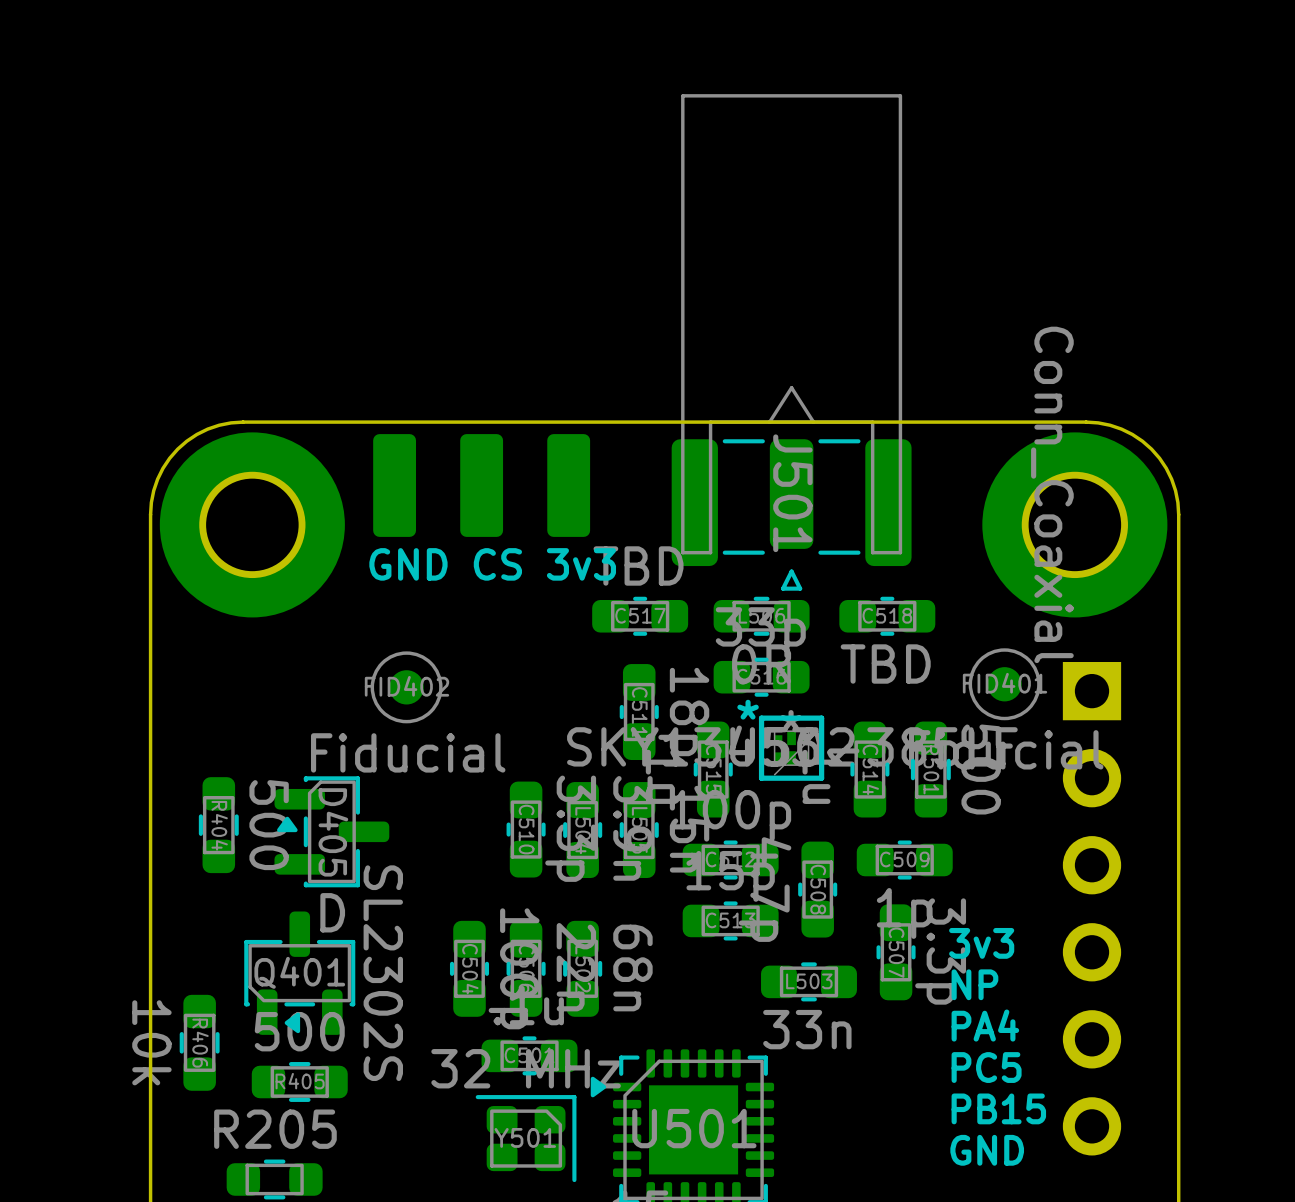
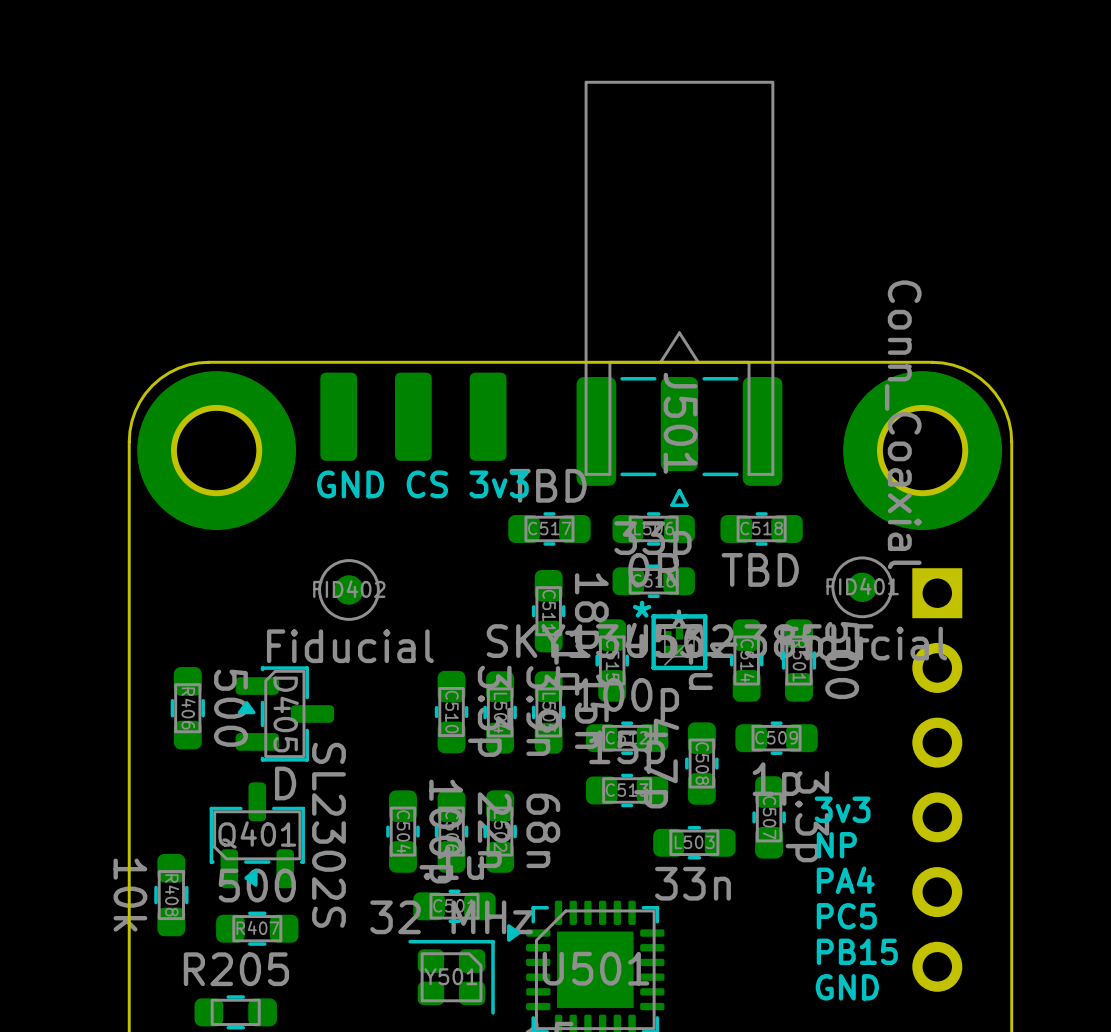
R404 name: R404 (219, 825) -> R406 (188, 708)
R406 name: R406 (200, 1043) -> R408 (172, 895)
R405 name: R405 (300, 1081) -> R407 (257, 927)

